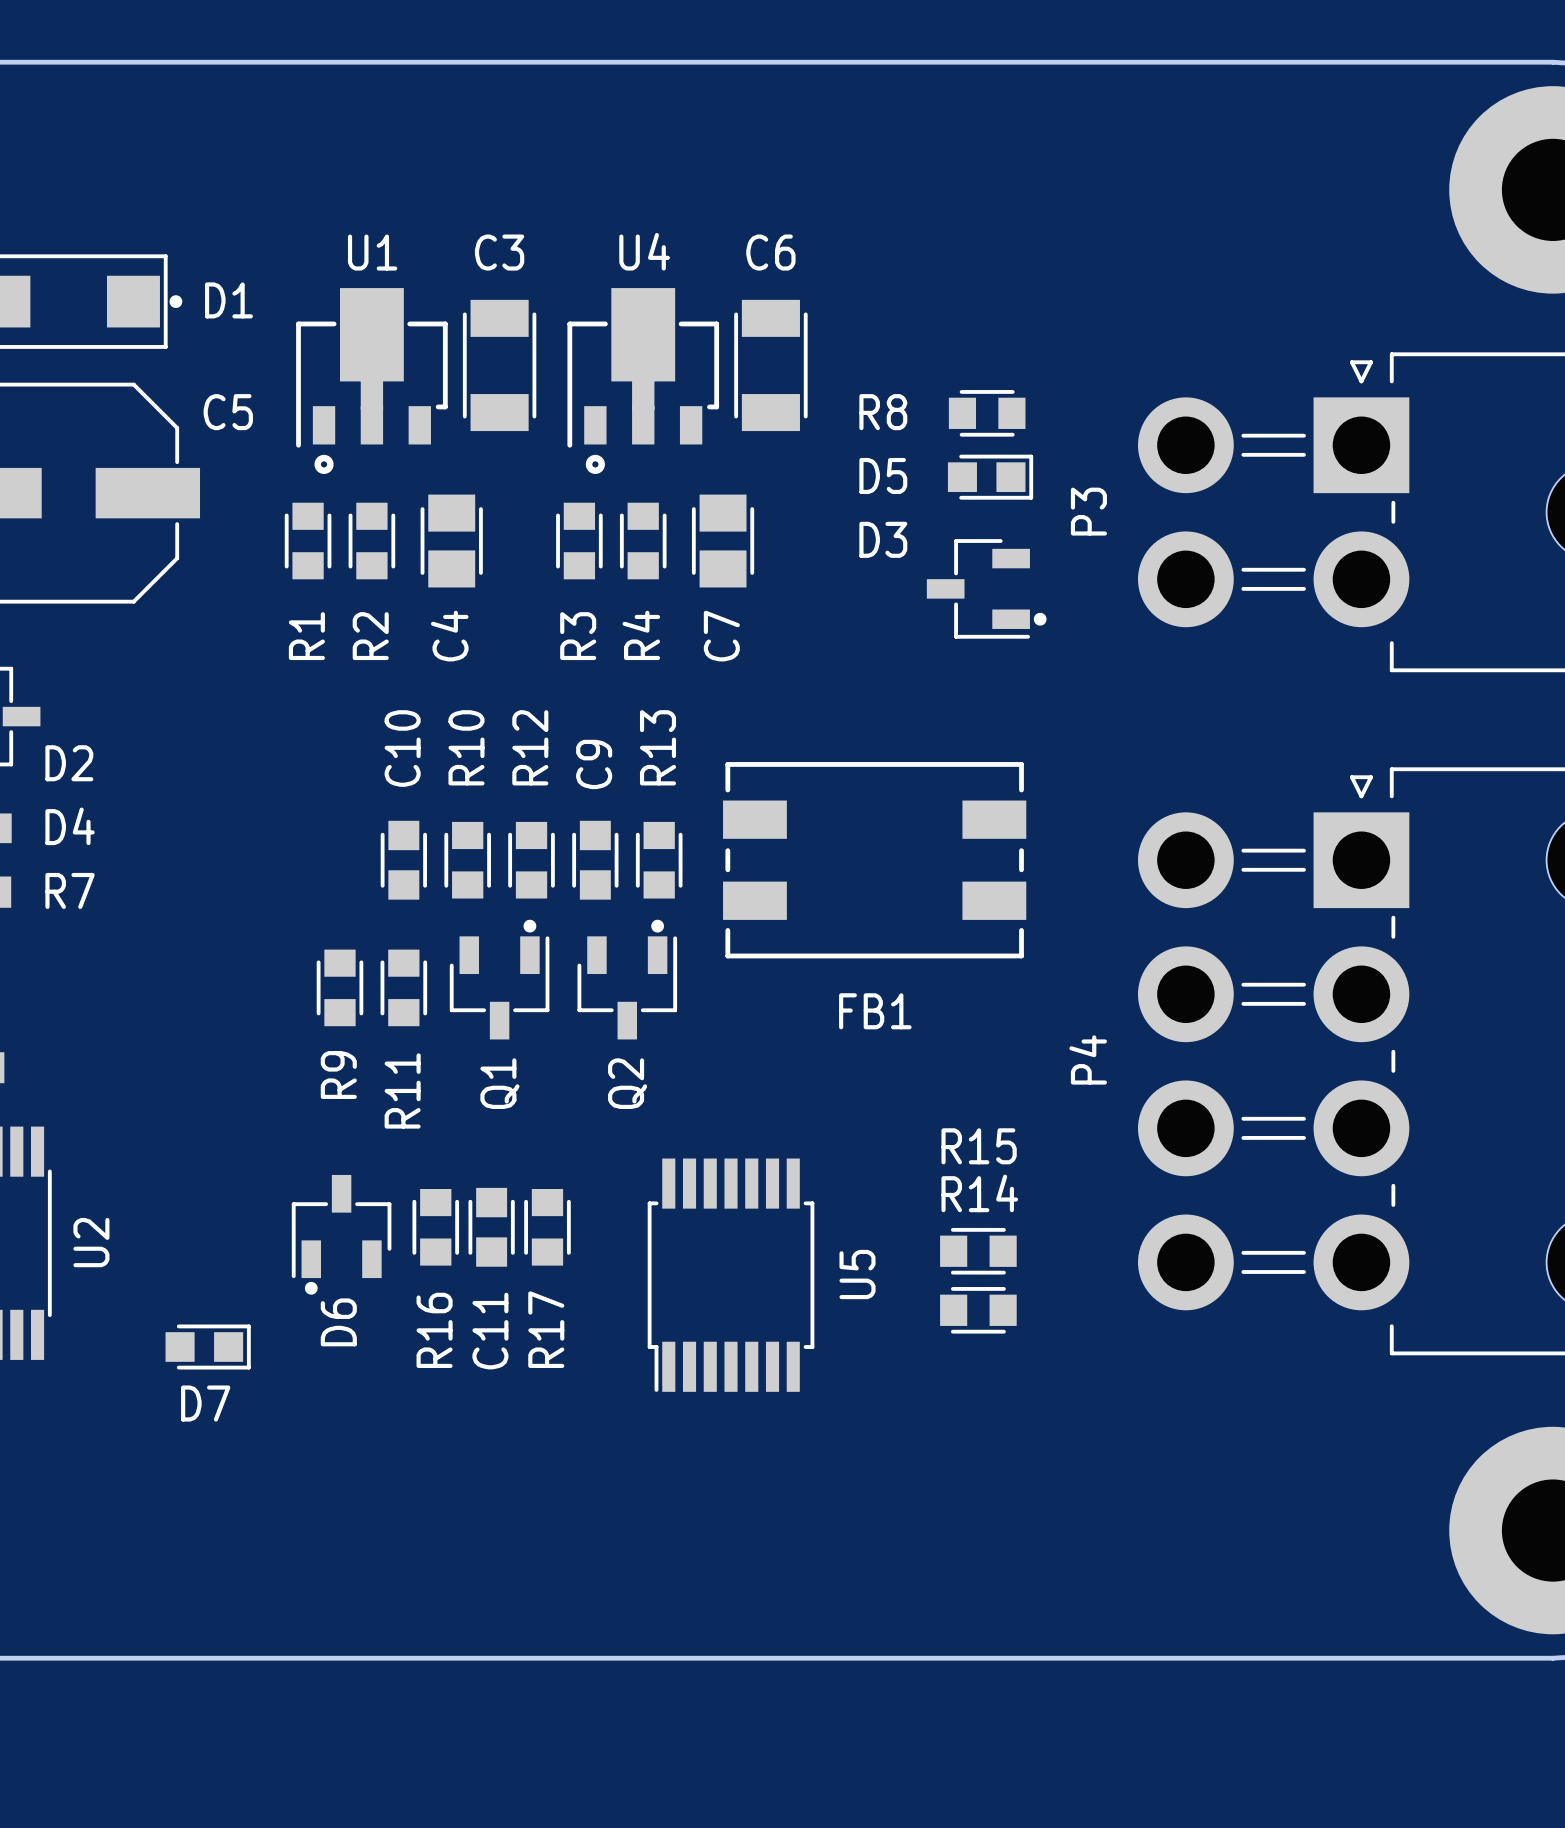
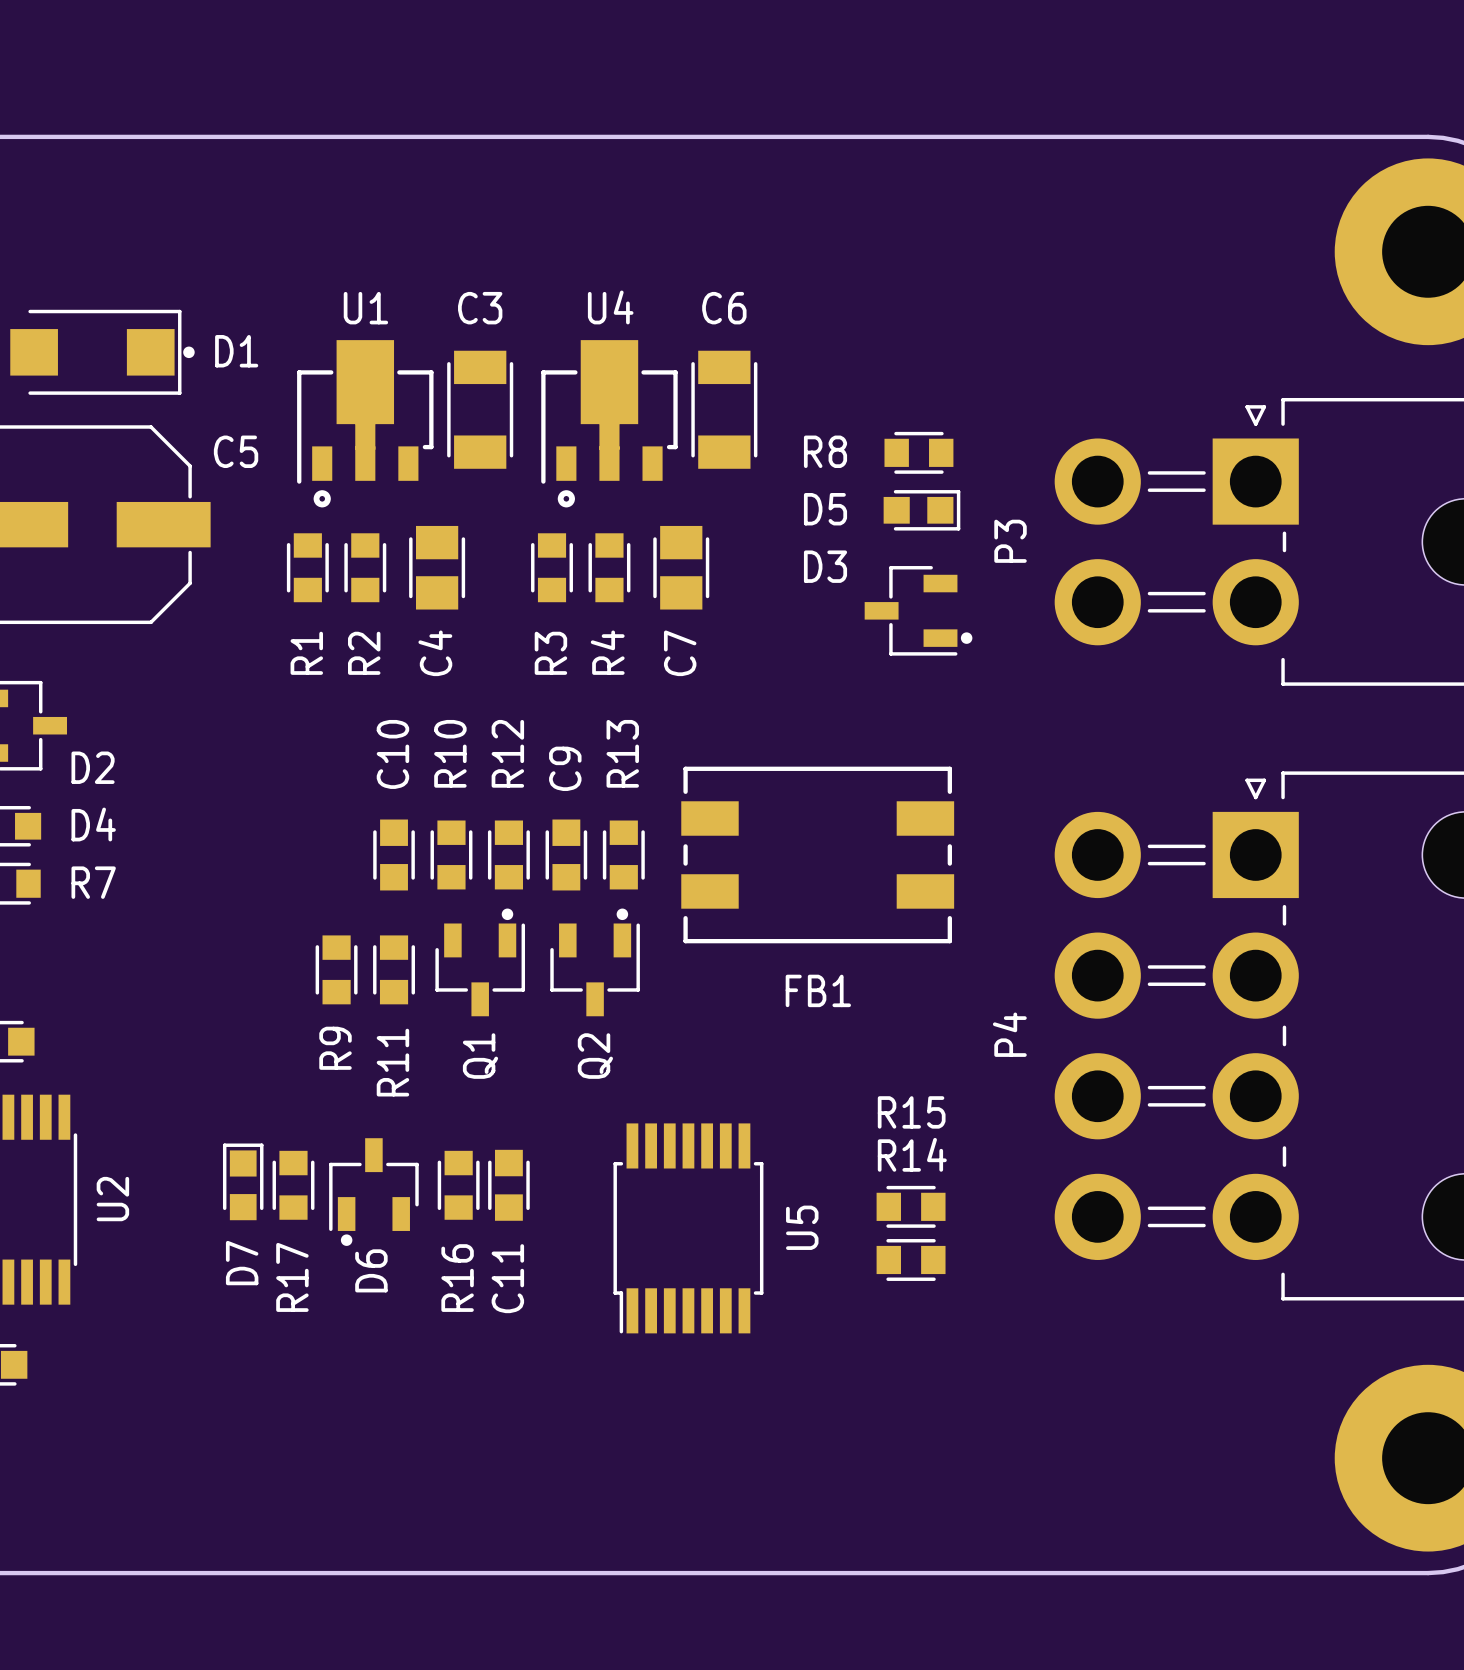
R16 position: (435, 1227) -> (458, 1185)
C11 position: (491, 1227) -> (508, 1185)
R17 position: (547, 1227) -> (293, 1185)
D6 position: (341, 1234) -> (373, 1192)
D7 rotation: 0° (208, 1347) -> 90° counterclockwise (243, 1181)
D7 position: (208, 1347) -> (243, 1181)

